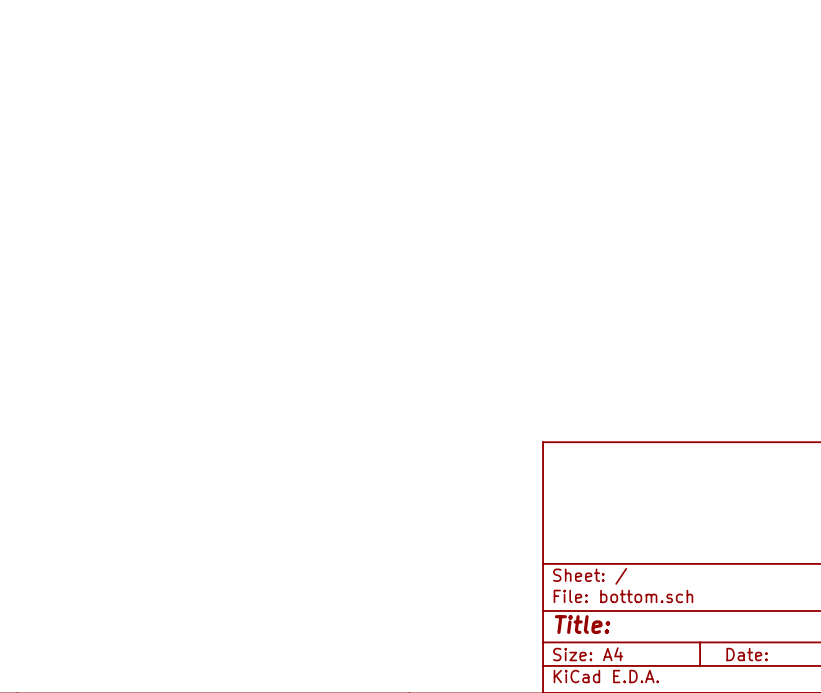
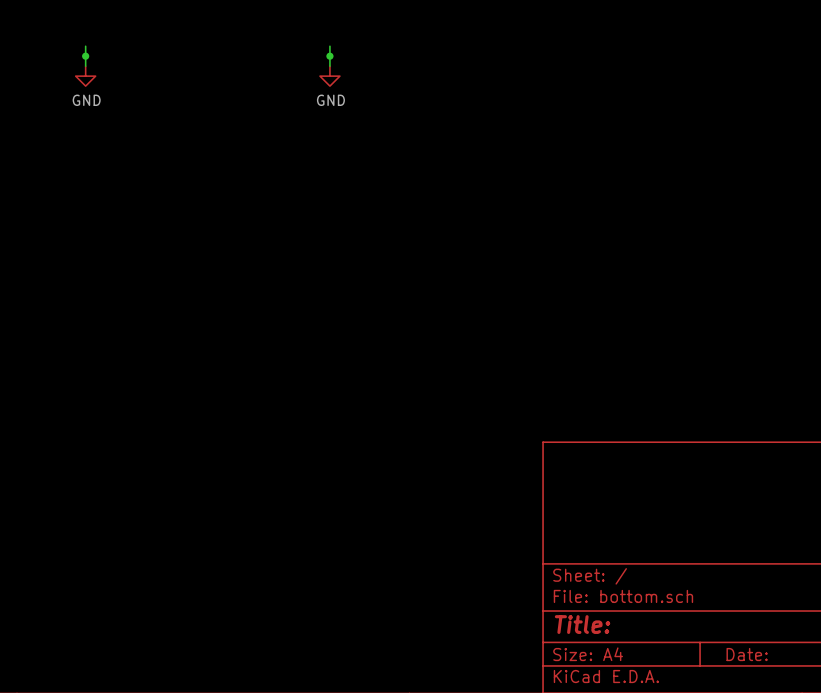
wire: none -> (85, 46) (85, 66)
wire: none -> (329, 46) (329, 66)
junction: none -> (85, 56)
junction: none -> (329, 56)
power symbol: none -> GND (85, 76)
power symbol: none -> GND (329, 76)

